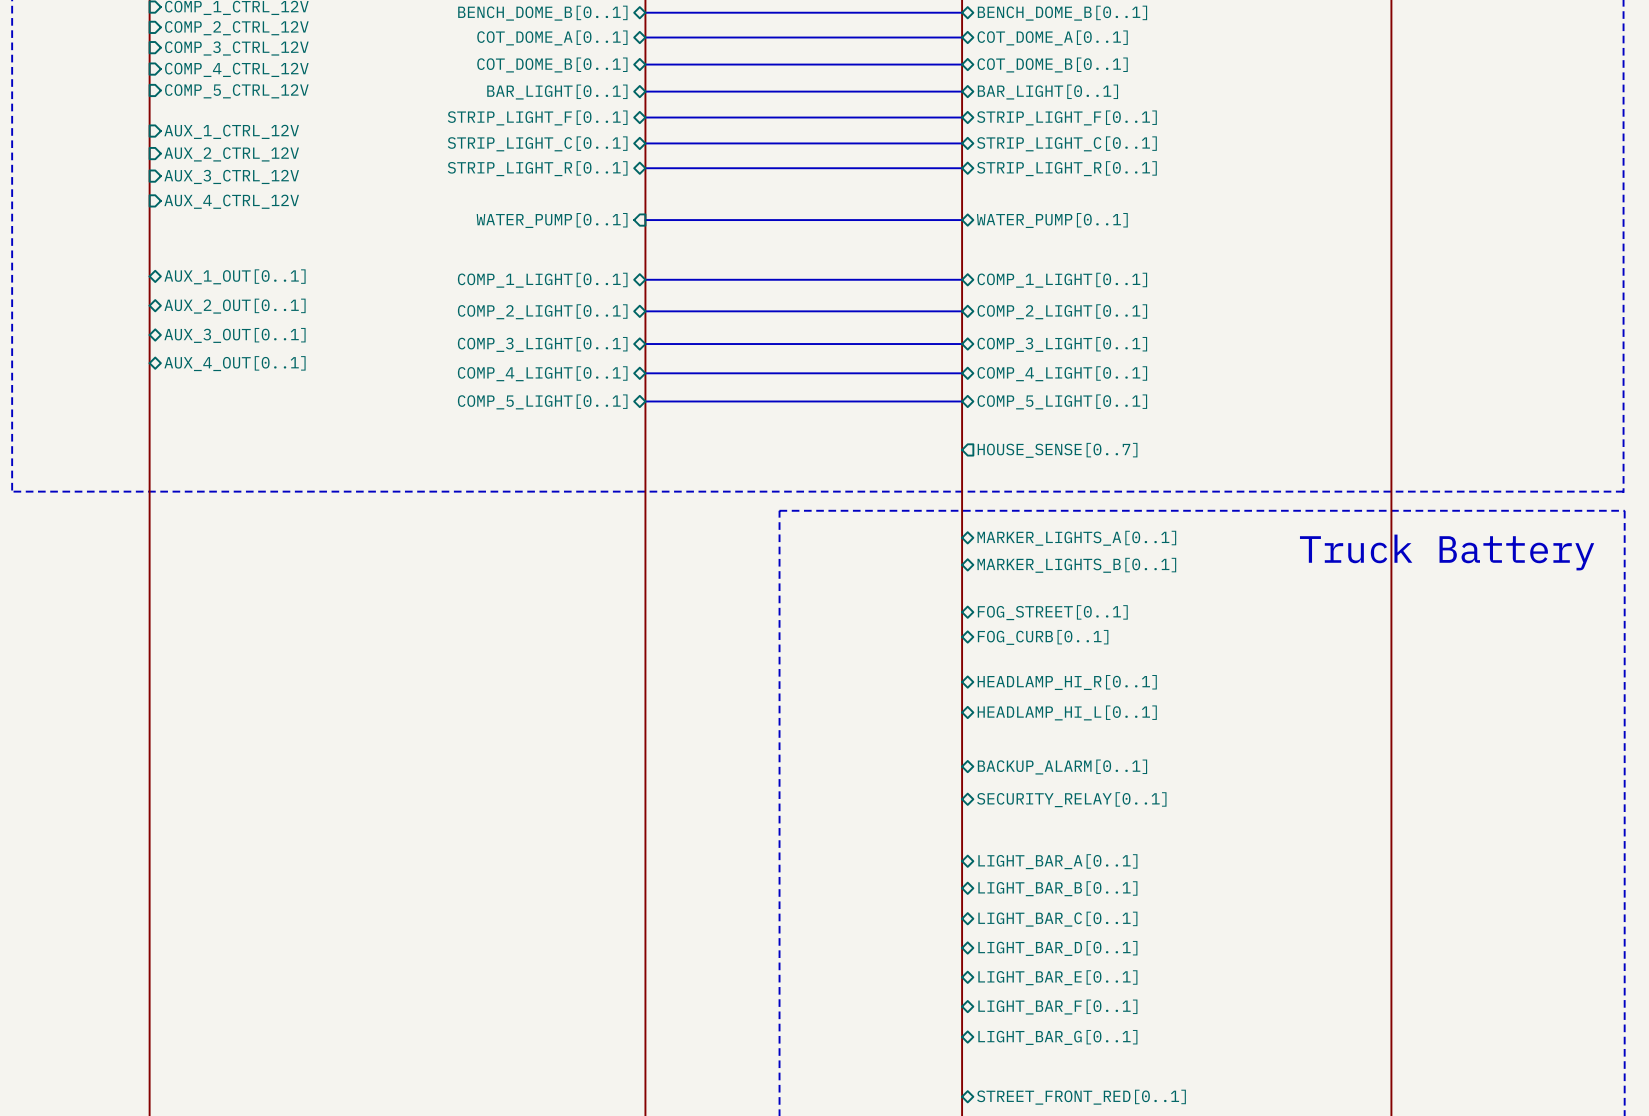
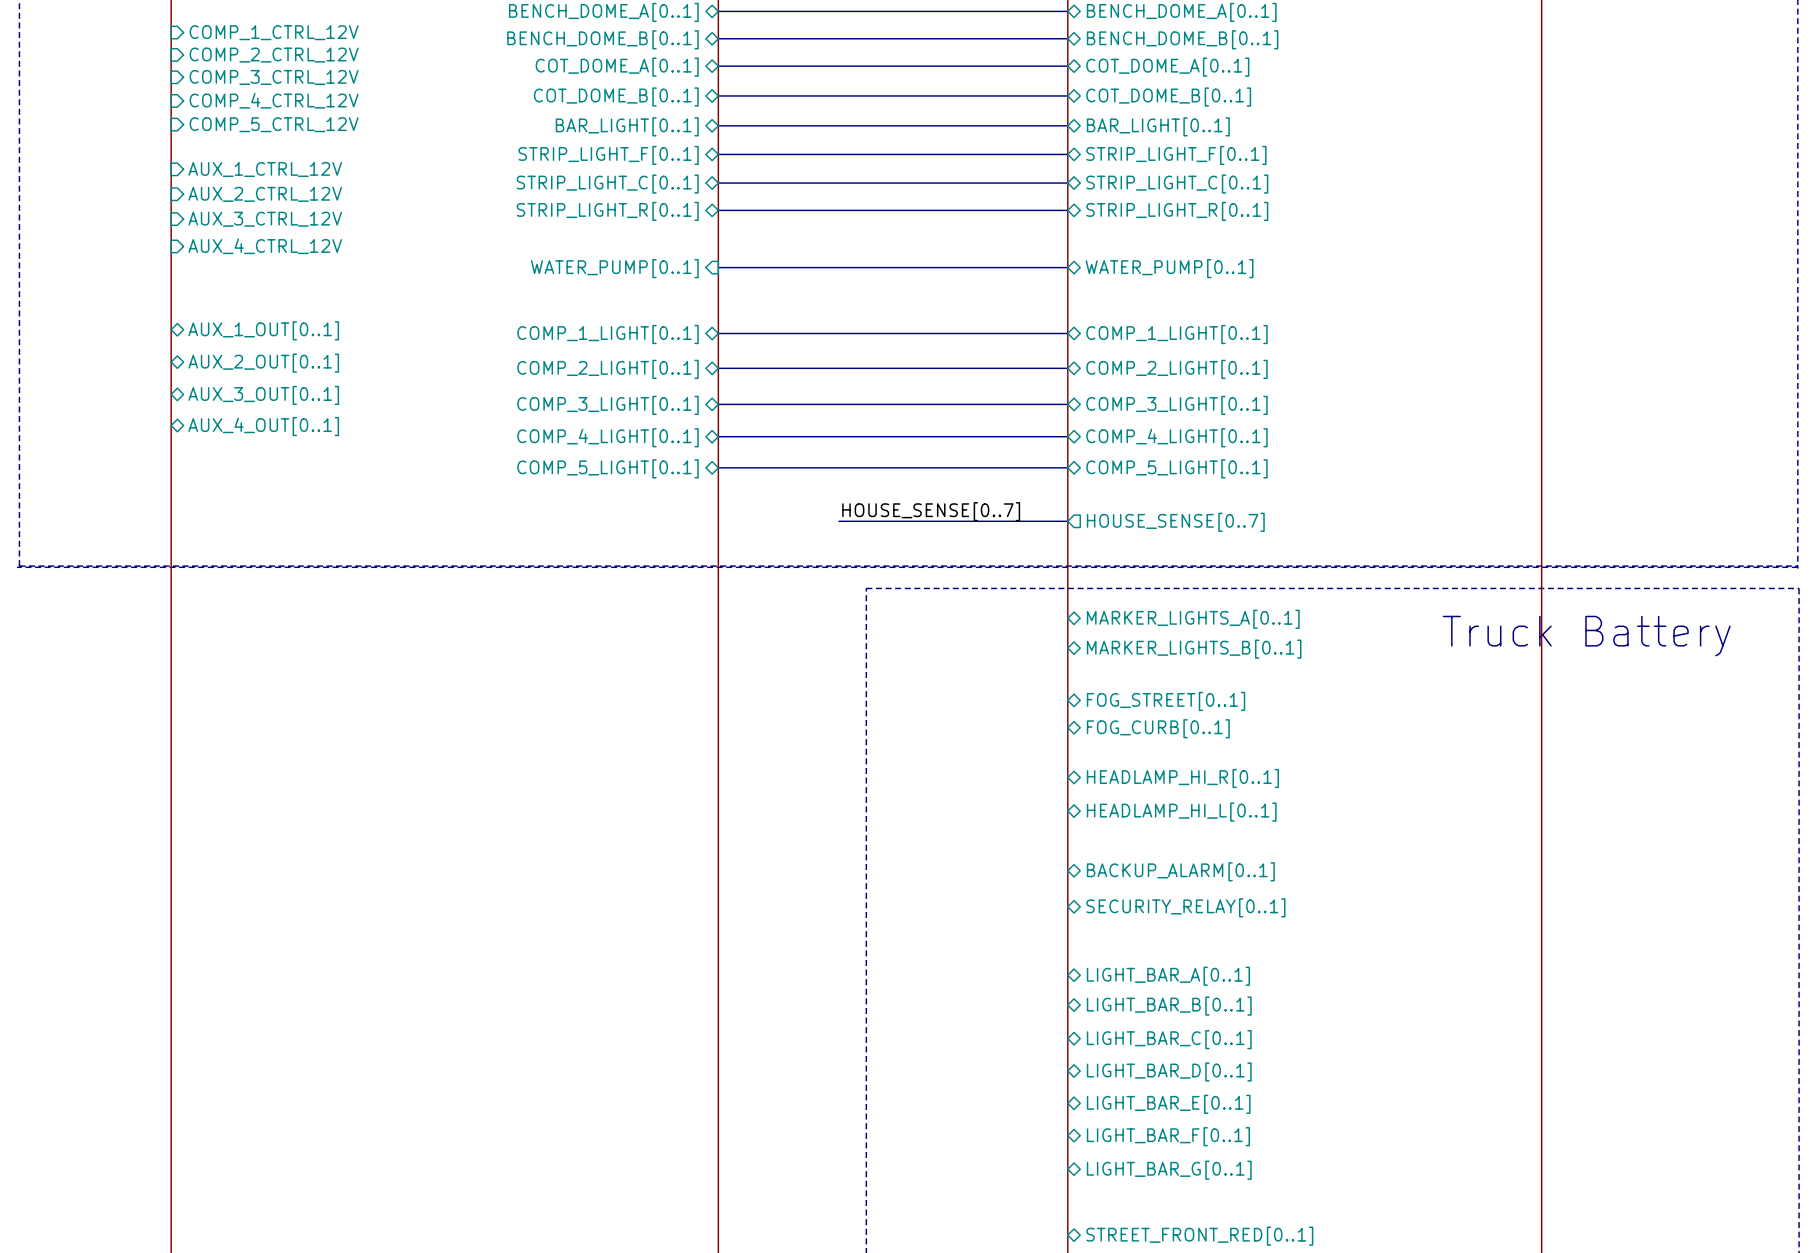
label: none -> HOUSE_SENSE[0..7] (931, 511)
bus: none -> (838, 521) (1067, 521)
line: none -> (19, 566) (1797, 566)

